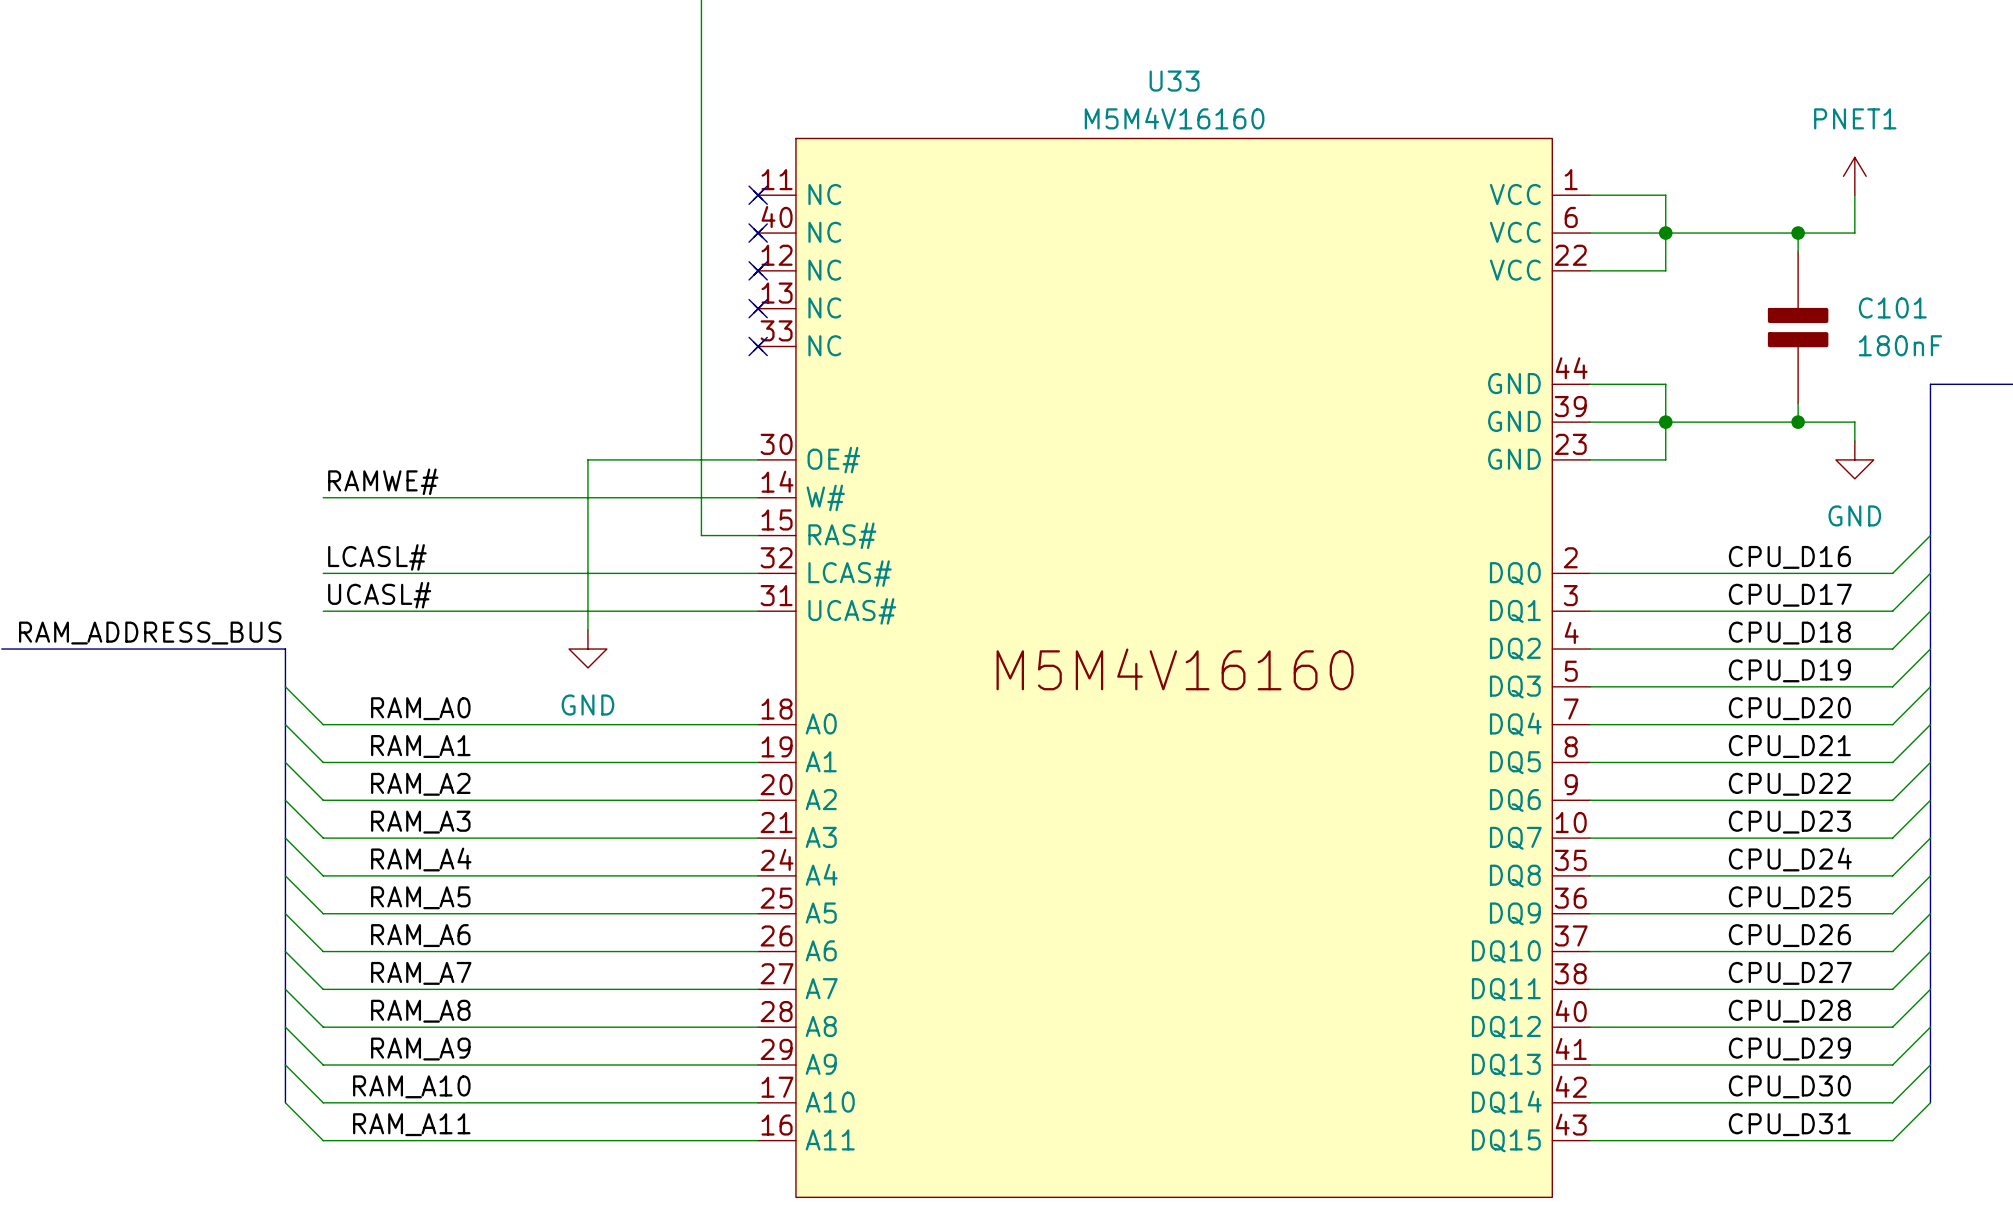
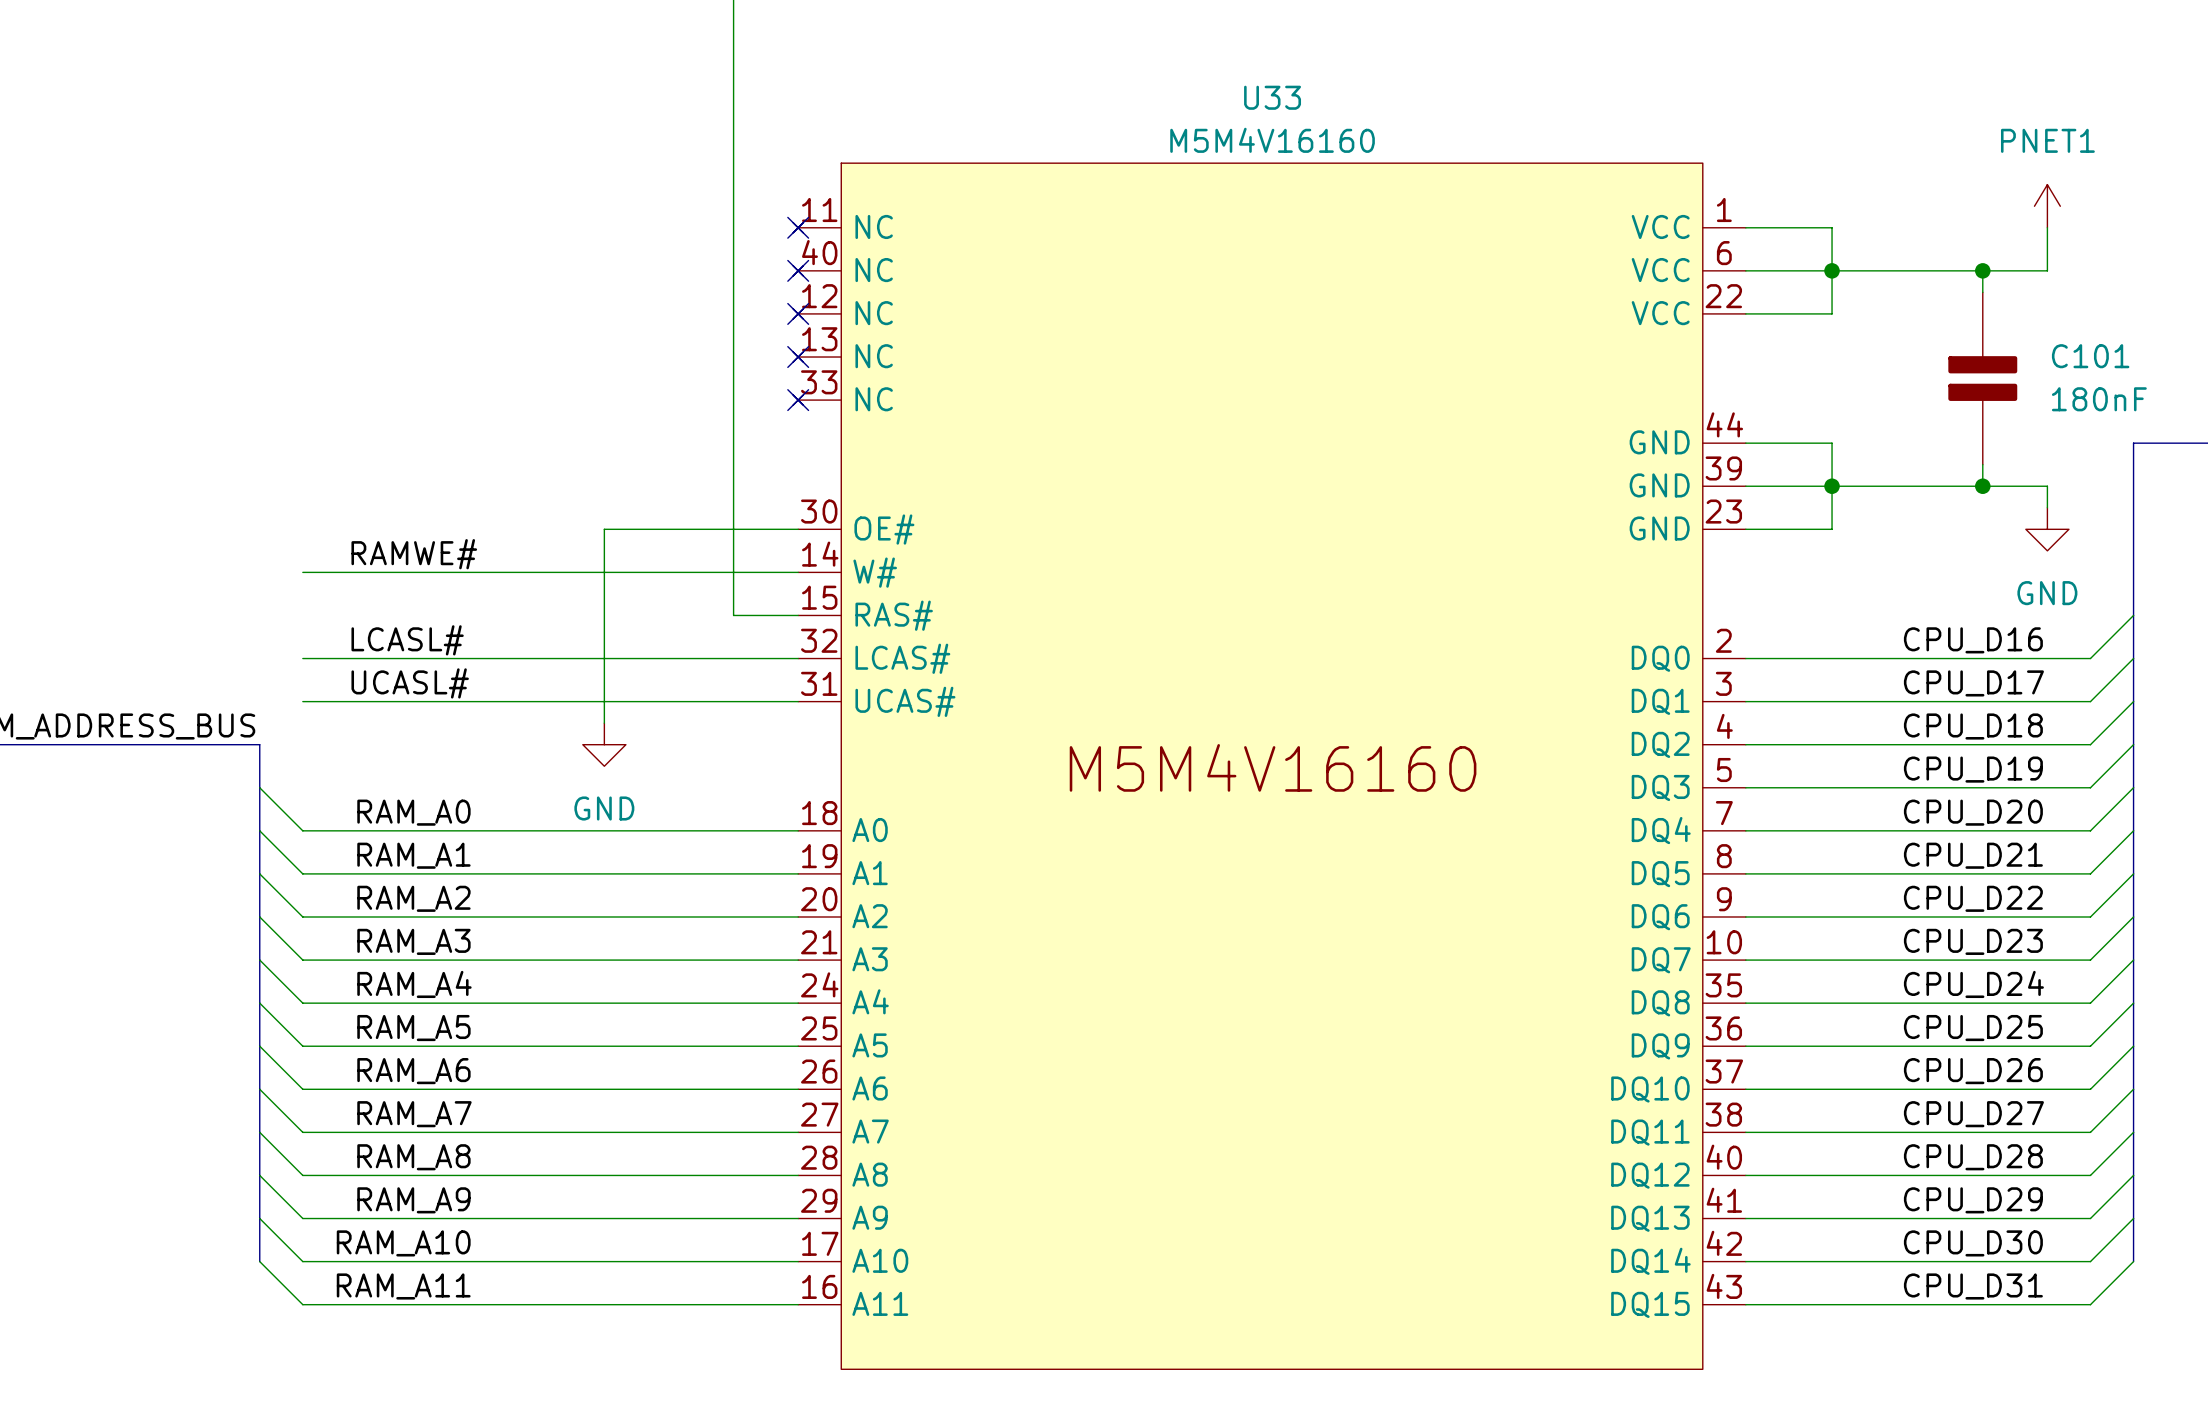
label position: RAMWE# (383, 481) -> RAMWE# (414, 554)
label position: LCASL# (377, 557) -> LCASL# (407, 640)
label position: UCASL# (379, 595) -> UCASL# (410, 683)

